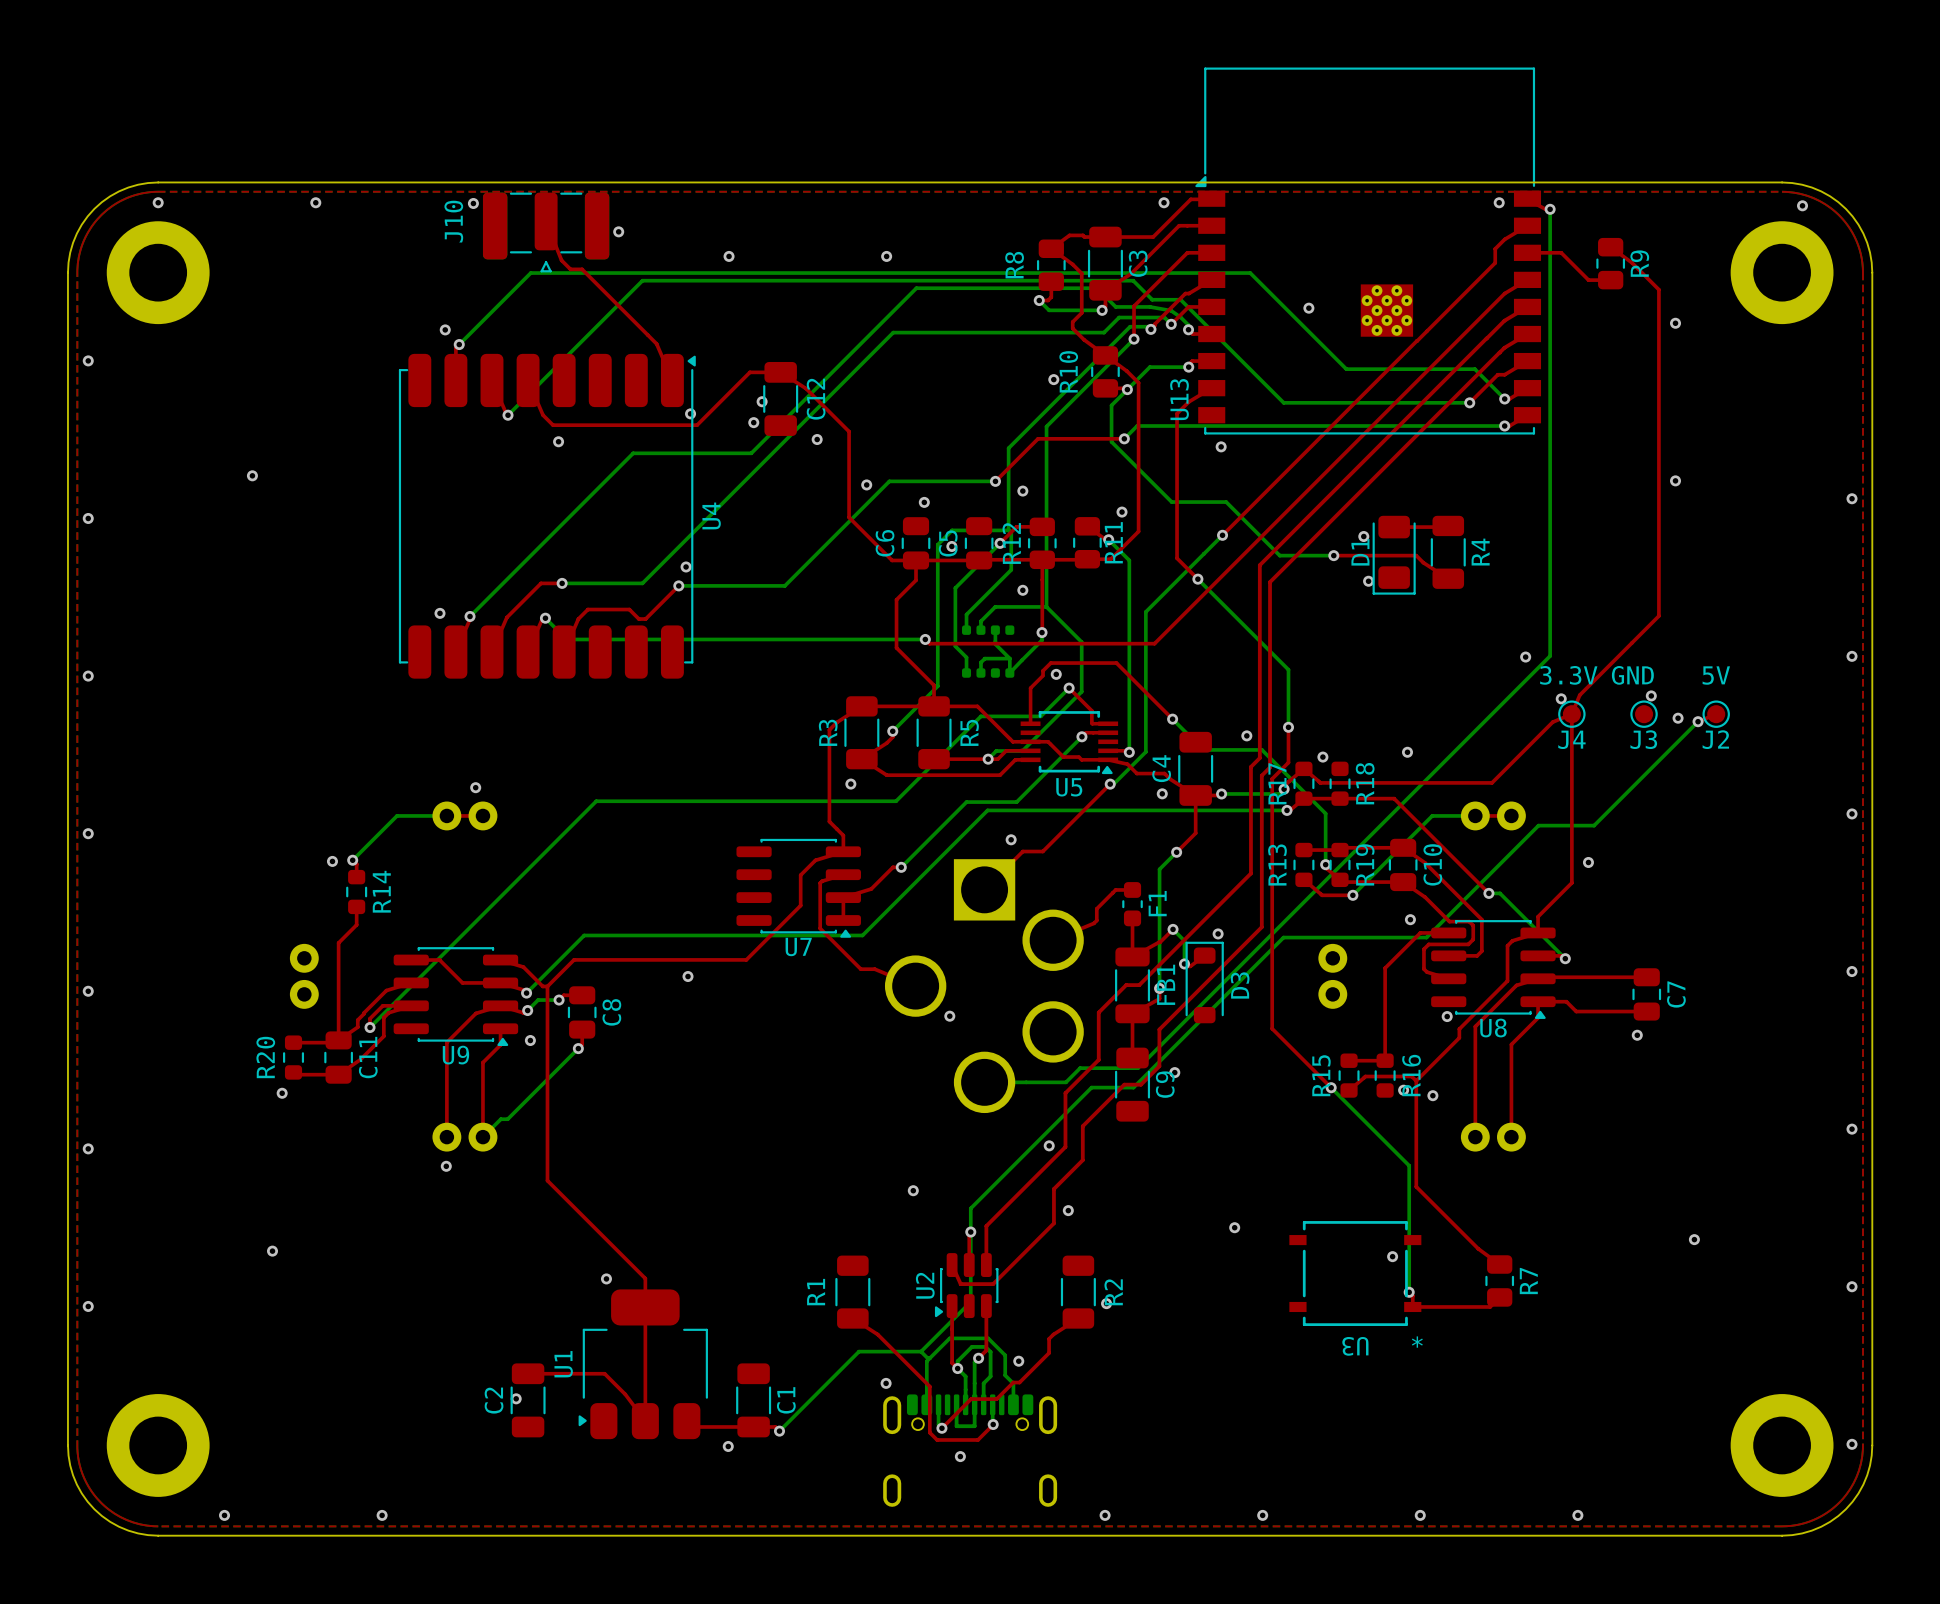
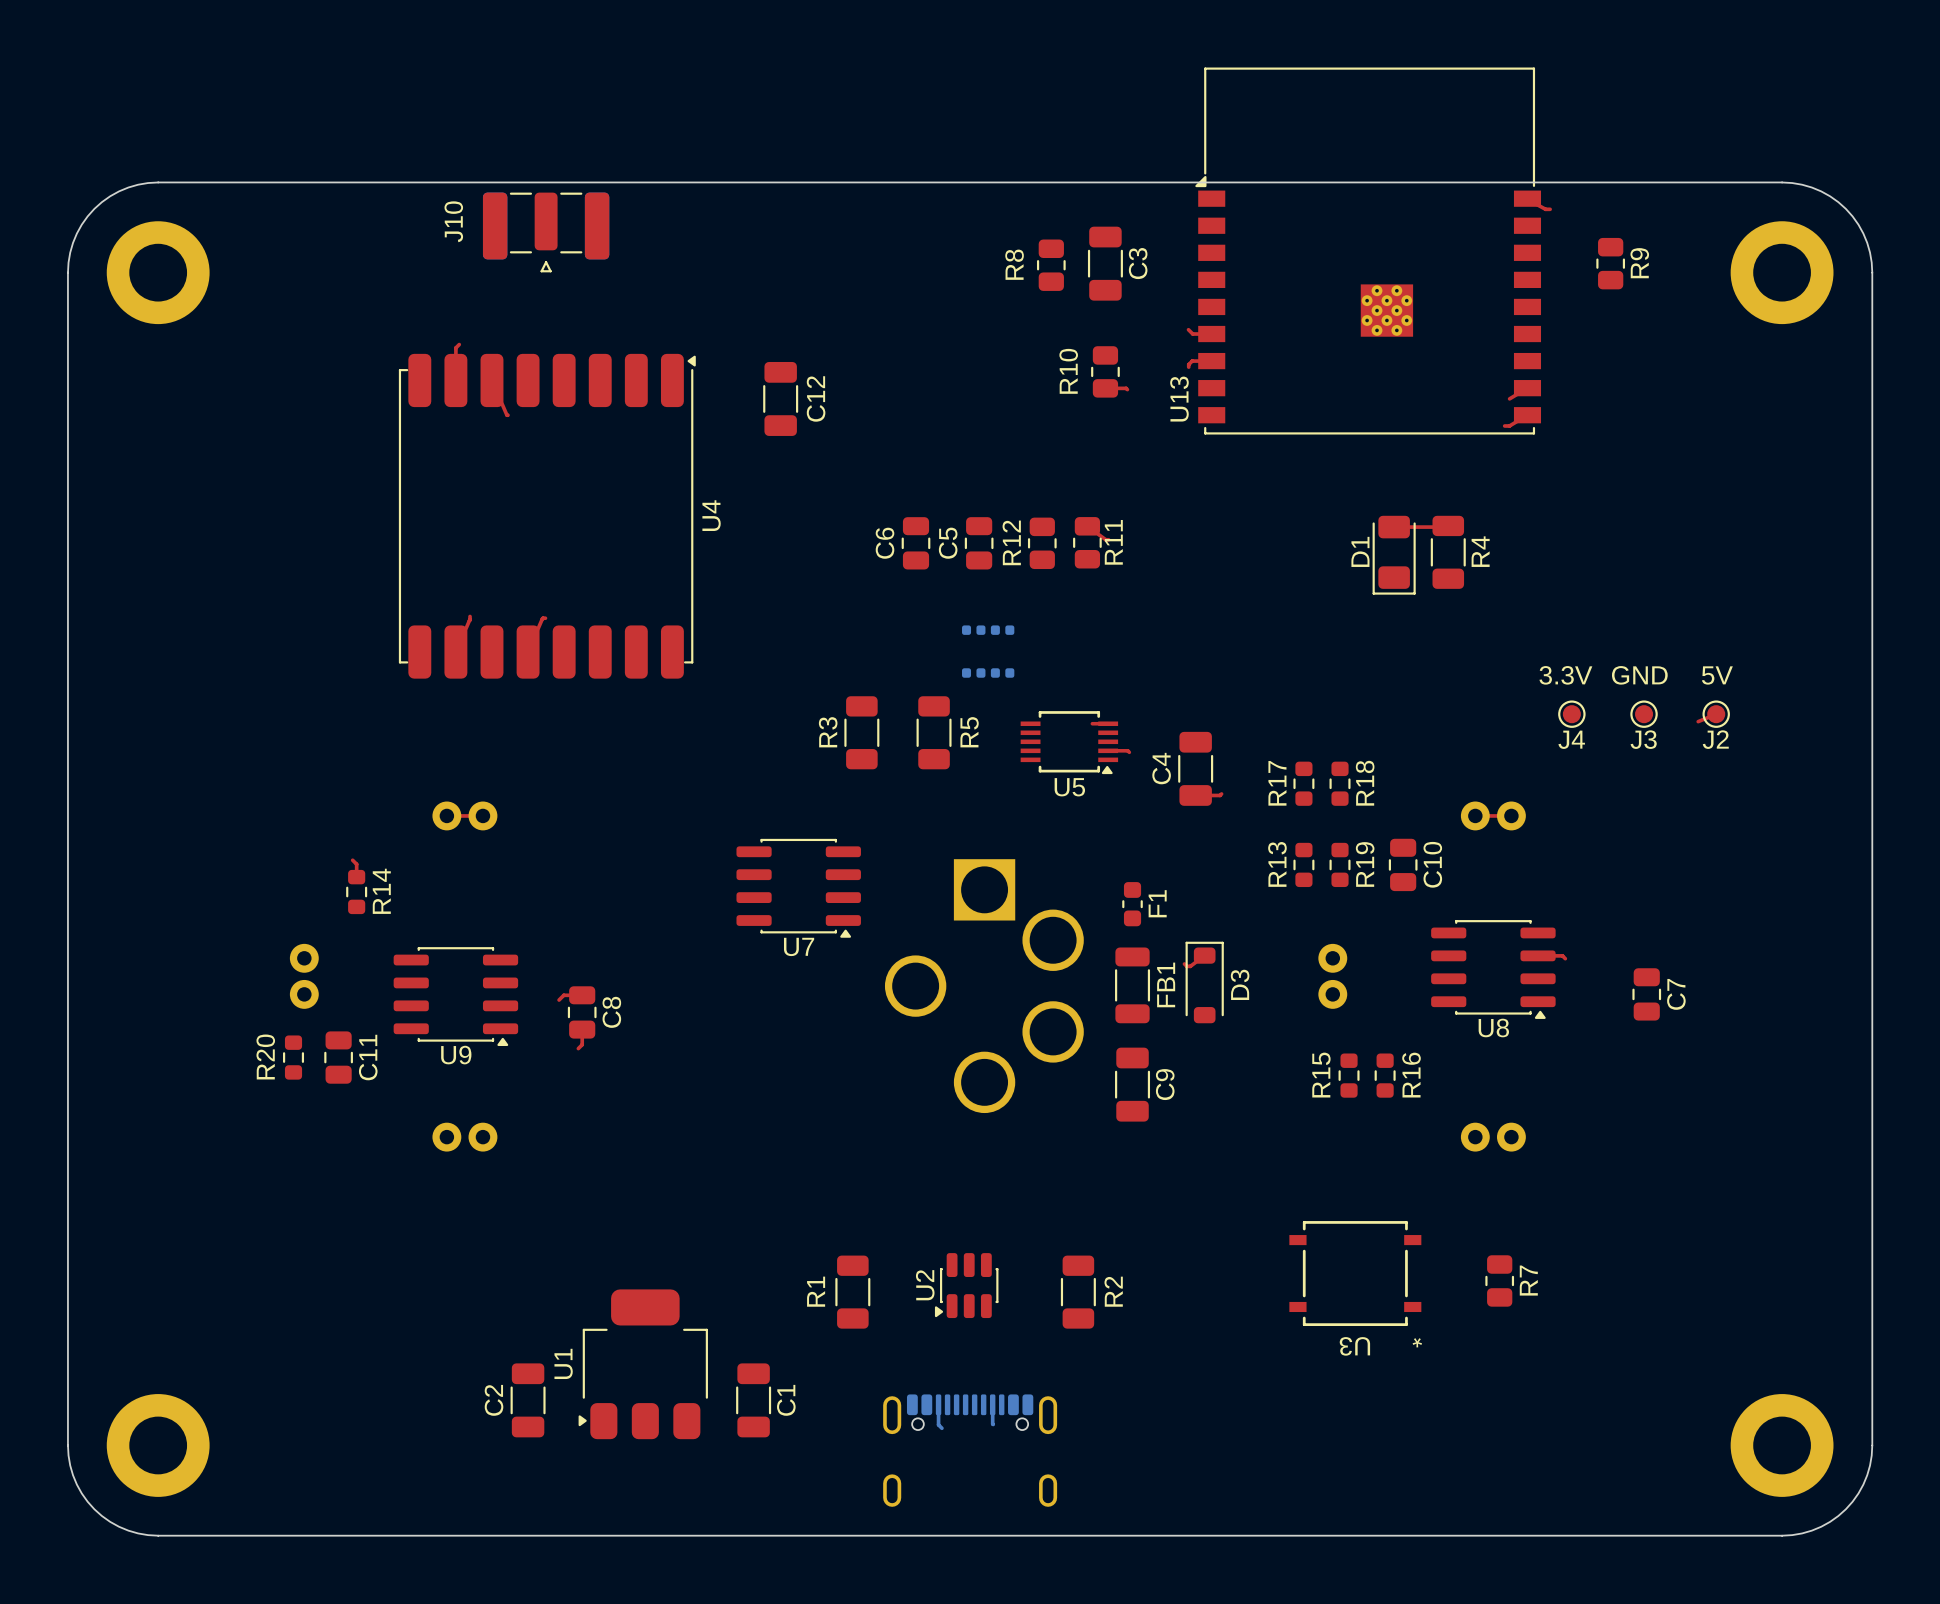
top zone outline: (153, 191) (126, 198) (101, 214) (91, 226) (83, 241) (77, 270) (77, 1447) (79, 1466) (86, 1483) (97, 1498) (108, 1509) (133, 1522) (158, 1526) (1782, 1526) (1800, 1524) (1817, 1518) (1833, 1508) (1846, 1494) (1859, 1470) (1862, 1445) (1862, 272) (1860, 254) (1854, 236) (1844, 221) (1831, 208) (1807, 195) (1782, 191) (153, 191) -> none
top track: (1211, 199) (1190, 199) (1153, 237) (1069, 235) (1051, 248) (1081, 273) (1081, 312) (1072, 322) (1072, 328) (1084, 339) (1126, 371) (1138, 382) (1138, 531) (1110, 559) (892, 560) (849, 517) (849, 431) (806, 388) (780, 372) (749, 372) (697, 425) (553, 425) (543, 415) (528, 380) -> none
via: (158, 202) -> none
via: (315, 202) -> none
via: (1164, 202) -> none
via: (1499, 202) -> none
via: (473, 203) -> none
via: (1802, 205) -> none
bottom track: (1550, 209) (1550, 656) (1138, 1068) (1080, 1068) (1065, 1082) (984, 1082) -> none
via: (1550, 209) -> none
top track: (546, 221) (561, 260) (570, 269) (582, 269) (656, 343) (672, 380) -> none
top track: (1211, 225) (1179, 225) (1130, 274) (1105, 290) (1105, 307) (1102, 310) -> none
top track: (1527, 225) (1504, 239) (1495, 248) (1495, 262) (1417, 340) -> none
via: (618, 231) -> none
top track: (1610, 247) (1632, 262) (1658, 289) (1658, 616) (1579, 695) (1571, 714) -> none
top track: (1211, 252) (1187, 252) (1134, 306) (1134, 339) -> none
top track: (1527, 252) (1561, 252) (1588, 280) (1610, 280) -> none
via: (729, 256) -> none
via: (886, 256) -> none
top track: (1211, 279) (1188, 293) (1185, 293) (1150, 329) -> none
top track: (1527, 279) (1504, 293) (1154, 643) (929, 643) (925, 639) -> none
top track: (1051, 281) (1051, 297) (1048, 300) (1039, 300) -> none
bottom track: (1039, 300) (1049, 310) (1102, 310) -> none
via: (1039, 300) -> none
top track: (1211, 306) (1188, 306) (1171, 324) -> none
top track: (1527, 306) (1504, 320) (1486, 338) -> none
via: (1308, 308) -> none
via: (1102, 310) -> none
via: (1675, 323) -> none
bottom track: (1171, 324) (1164, 317) (1119, 317) (1104, 332) (893, 332) (642, 583) (562, 583) -> none
via: (1171, 324) -> none
via: (445, 329) -> none
bottom track: (1150, 329) (1148, 326) (1130, 326) (1008, 448) (1008, 530) -> none
via: (1150, 329) -> none
bottom track: (1188, 329) (1188, 325) (1171, 310) (1150, 306) (1115, 306) (1097, 288) (916, 288) (751, 453) (633, 453) (470, 616) -> none
via: (1188, 329) -> none
top track: (1527, 334) (1504, 347) (1270, 582) (1270, 767) (1261, 775) (1261, 927) (1159, 1029) (1159, 1066) (1140, 1084) (1124, 1084) (1082, 1126) (1082, 1160) (1053, 1189) (1053, 1223) (993, 1284) (960, 1284) (952, 1265) -> none
top track: (1486, 338) (1259, 565) (1259, 758) (1250, 766) (1250, 873) (1139, 985) (1126, 985) (1098, 1012) (1098, 1059) (1065, 1093) (1065, 1146) (986, 1226) (986, 1265) -> none
bottom track: (1134, 339) (1046, 426) (1046, 606) -> none
via: (1134, 339) -> none
top track: (1416, 340) (1222, 535) -> none
bottom track: (459, 344) (530, 273) (1250, 273) (1346, 369) (1474, 369) (1504, 398) -> none
via: (459, 344) -> none
via: (88, 360) -> none
top track: (1527, 361) (1504, 374) (1497, 374) (1469, 402) -> none
bottom track: (1188, 367) (1149, 367) (1111, 405) (1111, 441) (1171, 502) (1226, 502) (1279, 555) (1333, 555) -> none
via: (1188, 367) -> none
via: (1053, 379) -> none
top track: (1211, 388) (1188, 401) (1177, 413) (1177, 558) (1197, 579) -> none
via: (1127, 389) -> none
via: (1504, 398) -> none
via: (762, 401) -> none
bottom track: (1469, 402) (1283, 402) (1180, 299) (1152, 299) (1133, 280) (642, 280) (508, 415) -> none
via: (1469, 402) -> none
via: (690, 413) -> none
via: (508, 415) -> none
via: (753, 422) -> none
bottom track: (1504, 425) (1137, 425) (1124, 438) -> none
via: (1504, 425) -> none
top track: (1124, 438) (1038, 438) (995, 481) -> none
via: (1124, 438) -> none
via: (817, 439) -> none
via: (558, 441) -> none
via: (1221, 446) -> none
via: (252, 475) -> none
via: (1675, 480) -> none
bottom track: (995, 481) (889, 481) (784, 585) (678, 585) -> none
via: (995, 481) -> none
via: (866, 484) -> none
via: (1022, 491) -> none
via: (1852, 498) -> none
via: (924, 502) -> none
via: (1122, 512) -> none
via: (88, 518) -> none
top track: (1042, 526) (1016, 526) (1000, 543) -> none
bottom track: (1008, 530) (1011, 533) (1011, 569) (966, 614) (966, 630) -> none
bottom track: (1008, 530) (952, 530) (937, 544) (937, 686) (892, 731) -> none
bottom track: (1222, 535) (1145, 611) (1145, 751) (1113, 784) (1110, 784) -> none
via: (1222, 535) -> none
via: (1363, 536) -> none
bottom track: (1108, 539) (1129, 560) (1129, 752) -> none
via: (1108, 539) -> none
bottom track: (1000, 543) (955, 588) (955, 646) (966, 657) (966, 673) -> none
via: (1000, 543) -> none
via: (951, 546) -> none
top track: (1333, 555) (1416, 555) (1423, 562) (1448, 578) -> none
via: (1333, 555) -> none
top track: (1042, 559) (1042, 632) -> none
top track: (916, 560) (916, 580) (896, 599) (896, 647) (934, 685) (934, 706) -> none
via: (686, 566) -> none
bottom track: (1197, 579) (1288, 669) (1288, 727) -> none
via: (1197, 579) -> none
via: (1368, 581) -> none
top track: (562, 583) (541, 583) (506, 617) (491, 652) -> none
via: (562, 583) -> none
top track: (678, 585) (645, 619) (638, 619) (629, 609) (587, 609) (578, 619) (564, 652) -> none
via: (678, 585) -> none
via: (1022, 590) -> none
bottom track: (1046, 606) (1081, 642) (1081, 691) (1022, 751) (996, 751) (988, 759) -> none
bottom track: (1046, 606) (995, 606) (980, 621) (980, 630) -> none
via: (439, 613) -> none
via: (470, 616) -> none
bottom track: (545, 618) (566, 639) (925, 639) -> none
via: (545, 618) -> none
bottom track: (995, 630) (995, 644) (1009, 658) -> none
bottom track: (1042, 632) (1042, 640) (1009, 673) (1009, 658) -> none
via: (1042, 632) -> none
via: (925, 639) -> none
via: (1852, 656) -> none
via: (1525, 657) -> none
bottom track: (1009, 658) (984, 658) (980, 662) (980, 673) -> none
via: (1056, 674) -> none
via: (88, 676) -> none
top track: (1069, 688) (1091, 710) (1092, 723) -> none
bottom track: (1069, 688) (1040, 716) (980, 716) (896, 801) (596, 801) (370, 1027) -> none
via: (1069, 688) -> none
via: (1651, 695) -> none
via: (1561, 698) -> none
top track: (1571, 714) (1571, 882) (1538, 916) (1538, 932) (1512, 940) (1507, 945) (1507, 980) (1459, 1029) (1459, 1037) (1416, 1080) -> none
top track: (1571, 714) (1552, 722) (1491, 782) (1320, 782) (1303, 768) (1284, 786) (1284, 789) -> none
via: (1678, 718) -> none
top track: (1172, 719) (1116, 663) (1050, 663) (1043, 670) (1043, 675) (1030, 688) (1030, 723) -> none
bottom track: (1172, 719) (1203, 749) (1261, 749) (1325, 813) (1325, 864) -> none
via: (1172, 719) -> none
bottom track: (1698, 721) (1594, 825) (1538, 825) (1426, 937) (1283, 937) (1133, 1087) (1091, 1087) (970, 1208) (970, 1301) (921, 1351) -> none
via: (1698, 721) -> none
top track: (1288, 727) (1288, 762) (1272, 778) (1272, 1028) (1331, 1087) -> none
via: (1288, 727) -> none
top track: (892, 731) (892, 737) (886, 743) (861, 759) (886, 775) (1000, 775) (1015, 759) (1030, 759) -> none
via: (892, 731) -> none
top track: (1108, 732) (1085, 732) (1081, 736) -> none
via: (1246, 735) -> none
bottom track: (1081, 736) (1016, 802) (966, 802) (901, 867) -> none
via: (1081, 736) -> none
top track: (1030, 750) (1006, 750) (997, 759) (934, 759) -> none
via: (1129, 752) -> none
via: (1407, 752) -> none
via: (1322, 757) -> none
via: (988, 759) -> none
via: (850, 784) -> none
top track: (1110, 784) (1042, 851) (1022, 851) (984, 889) -> none
via: (1110, 784) -> none
via: (475, 787) -> none
bottom track: (1284, 789) (1279, 793) (1221, 793) -> none
via: (1284, 789) -> none
via: (1162, 793) -> none
via: (1221, 793) -> none
top track: (1287, 810) (1290, 809) (1303, 798) (1394, 798) (1488, 893) -> none
bottom track: (1287, 810) (987, 810) (862, 935) (584, 935) (526, 993) -> none
via: (1287, 810) -> none
via: (1852, 813) -> none
bottom track: (446, 815) (396, 815) (352, 860) -> none
bottom track: (1475, 815) (1432, 815) (1352, 895) -> none
via: (88, 833) -> none
via: (1011, 839) -> none
top track: (1303, 850) (1403, 847) (1425, 862) (1481, 919) (1481, 951) (1477, 955) (1448, 955) -> none
top track: (1176, 852) (1195, 833) (1195, 795) (1164, 773) (1136, 773) (1127, 764) (1108, 759) (1081, 759) (1078, 757) (1063, 757) (1048, 741) (1012, 741) (977, 706) (861, 706) (836, 722) (829, 729) (829, 821) (843, 835) (843, 851) (815, 860) (800, 875) (800, 905) (746, 959) (574, 959) (547, 986) -> none
bottom track: (1176, 852) (1159, 869) (1159, 988) -> none
via: (1176, 852) -> none
via: (352, 860) -> none
via: (332, 861) -> none
via: (1588, 862) -> none
top track: (1325, 864) (1325, 867) (1342, 882) (1403, 882) (1425, 897) (1449, 921) (1469, 921) (1473, 925) (1473, 939) (1468, 944) (1428, 944) (1423, 949) (1423, 969) (1426, 972) (1448, 978) -> none
via: (1325, 864) -> none
top track: (901, 867) (892, 867) (871, 889) (843, 897) (843, 920) -> none
via: (901, 867) -> none
top track: (843, 874) (820, 883) (820, 928) (860, 969) (874, 969) (915, 986) -> none
top track: (1303, 879) (1322, 895) (1352, 895) -> none
top track: (1132, 889) (1115, 889) (1096, 908) (1096, 920) (1093, 923) (1053, 940) -> none
bottom track: (1488, 893) (1500, 893) (1565, 958) -> none
via: (1488, 893) -> none
via: (1352, 895) -> none
top track: (356, 906) (356, 924) (338, 942) (338, 1040) -> none
top track: (1132, 918) (1132, 956) (1160, 942) (1173, 929) -> none
via: (1410, 919) -> none
bottom track: (1173, 929) (1184, 940) (1184, 963) -> none
via: (1173, 929) -> none
top track: (1448, 932) (1420, 932) (1385, 968) (1385, 1060) (1349, 1060) -> none
via: (1218, 933) -> none
via: (1565, 958) -> none
top track: (411, 960) (439, 960) (462, 982) (500, 982) (524, 990) (526, 993) -> none
top track: (500, 960) (523, 967) (542, 986) (547, 986) -> none
via: (1184, 963) -> none
via: (1852, 971) -> none
via: (688, 976) -> none
top track: (1646, 977) (1539, 977) (1516, 985) (1475, 1026) (1475, 1137) -> none
top track: (411, 982) (386, 990) (357, 1020) (357, 1027) (338, 1040) -> none
top track: (547, 986) (547, 1180) (645, 1278) (645, 1421) (625, 1394) (604, 1373) (528, 1373) -> none
top track: (1159, 988) (1159, 999) (1132, 1013) (1132, 1058) -> none
via: (1159, 988) -> none
via: (88, 991) -> none
via: (526, 993) -> none
bottom track: (559, 1000) (538, 1000) (527, 1010) -> none
via: (559, 1000) -> none
top track: (527, 1010) (523, 1012) (500, 1005) (475, 1013) (446, 1042) (446, 1137) -> none
via: (527, 1010) -> none
top track: (1646, 1011) (1576, 1011) (1566, 1001) (1538, 1001) (1538, 1017) (1511, 1044) (1511, 1137) -> none
via: (949, 1016) -> none
via: (1447, 1016) -> none
top track: (370, 1027) (370, 1018) (382, 1005) (411, 1005) (388, 1012) (383, 1017) (383, 1036) (360, 1059) (338, 1074) (295, 1074) (293, 1072) -> none
via: (370, 1027) -> none
top track: (500, 1028) (500, 1044) (482, 1062) (482, 1137) -> none
via: (1637, 1035) -> none
top track: (338, 1040) (336, 1042) (293, 1042) -> none
via: (530, 1040) -> none
bottom track: (578, 1048) (507, 1119) (500, 1119) (482, 1137) -> none
via: (578, 1048) -> none
via: (1174, 1072) -> none
top track: (1416, 1080) (1411, 1076) (1365, 1076) (1349, 1090) -> none
top track: (1416, 1080) (1416, 1186) (1478, 1248) (1499, 1264) -> none
bottom track: (1331, 1087) (1409, 1165) (1409, 1292) -> none
via: (1331, 1087) -> none
via: (1403, 1090) -> none
via: (282, 1093) -> none
via: (1432, 1095) -> none
via: (1852, 1129) -> none
via: (1049, 1145) -> none
via: (88, 1148) -> none
via: (446, 1166) -> none
via: (913, 1190) -> none
via: (1068, 1210) -> none
via: (1234, 1227) -> none
top track: (970, 1232) (969, 1265) -> none
via: (970, 1232) -> none
via: (1694, 1239) -> none
via: (272, 1251) -> none
via: (1392, 1256) -> none
via: (606, 1278) -> none
via: (1852, 1286) -> none
top track: (1409, 1292) (1412, 1295) (1412, 1306) (1490, 1306) (1499, 1297) -> none
via: (1409, 1292) -> none
via: (1106, 1303) -> none
via: (88, 1306) -> none
top track: (952, 1306) (952, 1362) (957, 1368) -> none
top track: (986, 1306) (986, 1350) (978, 1358) -> none
top track: (852, 1318) (877, 1334) (929, 1386) (929, 1432) (937, 1439) (978, 1439) (991, 1426) -> none
top track: (1078, 1318) (1049, 1338) (1049, 1353) (1019, 1382) (1013, 1382) (996, 1399) (971, 1399) (941, 1428) -> none
bottom track: (921, 1351) (929, 1358) -> none
bottom track: (921, 1351) (858, 1351) (779, 1431) -> none
bottom track: (978, 1358) (974, 1362) (974, 1426) (956, 1426) (956, 1404) -> none
via: (978, 1358) -> none
via: (1018, 1361) -> none
via: (957, 1368) -> none
via: (886, 1383) -> none
via: (516, 1398) -> none
bottom track: (926, 1404) (926, 1361) (949, 1338) (988, 1338) (1005, 1355) (1005, 1375) (1013, 1383) (1013, 1404) -> none
bottom track: (965, 1404) (965, 1376) (957, 1368) (957, 1361) (971, 1346) (985, 1346) (990, 1351) (990, 1376) (983, 1383) (983, 1404) -> none
top track: (686, 1421) (692, 1426) (775, 1426) (779, 1431) -> none
via: (993, 1424) -> none
via: (941, 1428) -> none
via: (779, 1431) -> none
via: (1852, 1444) -> none
via: (728, 1446) -> none
via: (960, 1456) -> none
via: (224, 1515) -> none
via: (382, 1515) -> none
via: (1105, 1515) -> none
via: (1262, 1515) -> none
via: (1420, 1515) -> none
via: (1577, 1515) -> none

